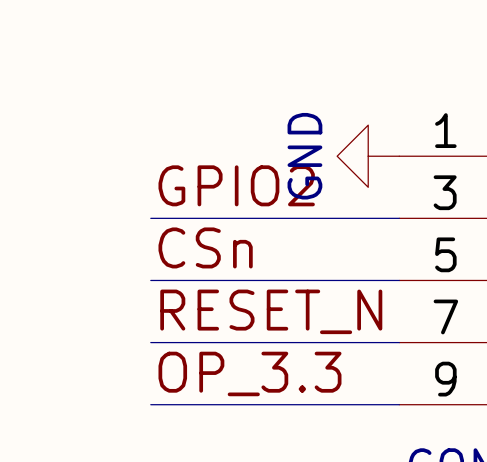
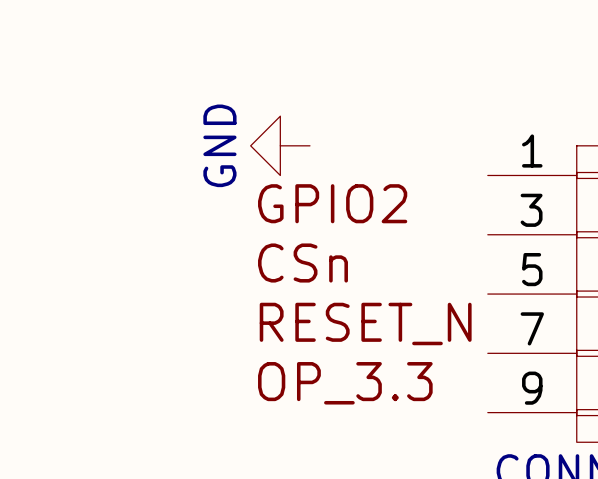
power symbol position: GND (368, 156) -> GND (280, 145)
wire: (150, 218) (399, 218) -> none
wire: (150, 280) (399, 280) -> none
wire: (150, 342) (399, 342) -> none
wire: (150, 404) (399, 404) -> none

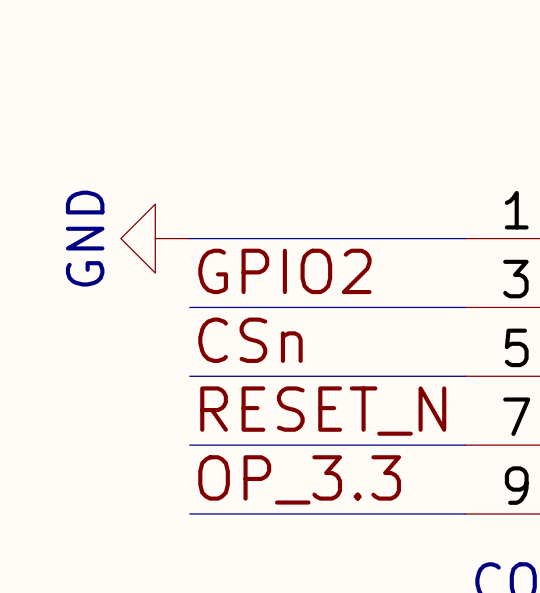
power symbol position: GND (280, 145) -> GND (155, 238)
wire: none -> (189, 238) (465, 238)
wire: none -> (189, 307) (465, 307)
wire: none -> (189, 376) (465, 376)
wire: none -> (189, 445) (465, 445)
wire: none -> (189, 513) (465, 513)

